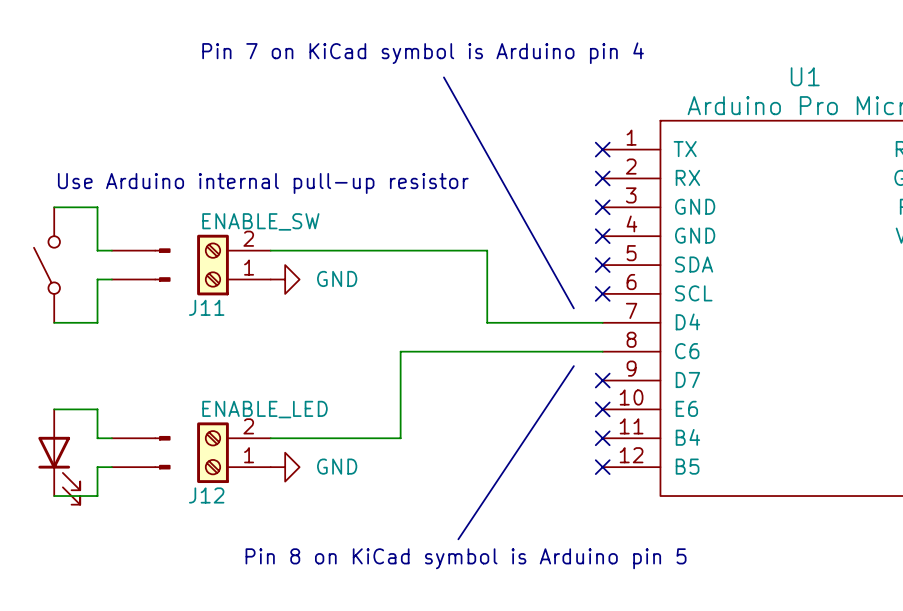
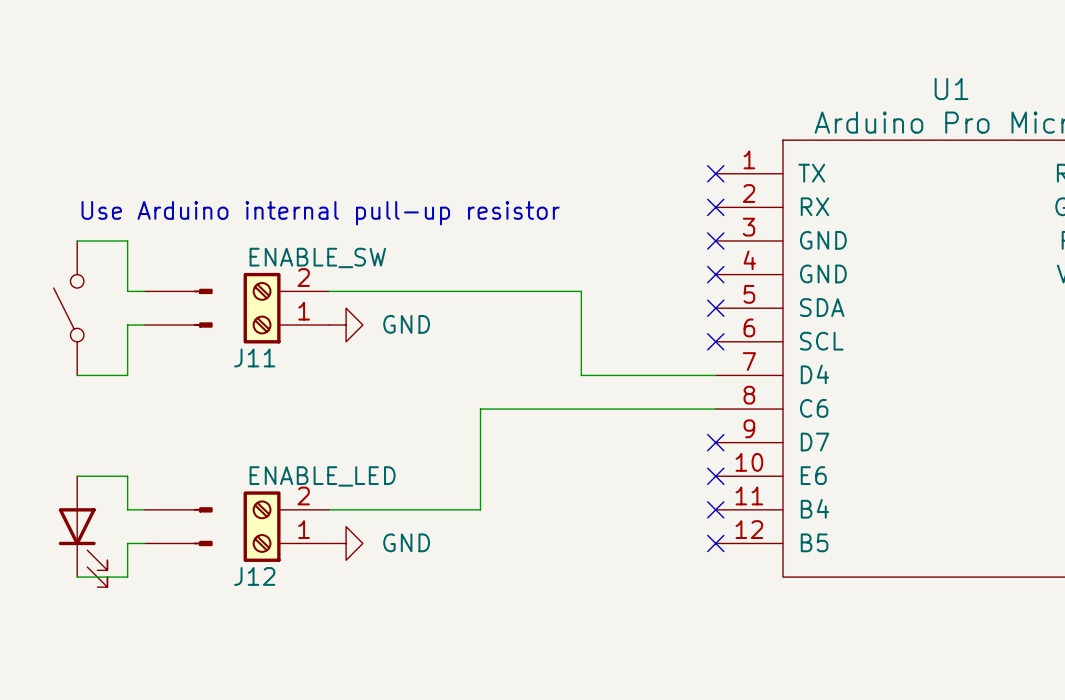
text: Pin 7 on KiCad symbol is Arduino pin 4 (423, 53) -> none
line: (443, 77) (573, 308) -> none
line: (573, 366) (458, 539) -> none
text: Pin 8 on KiCad symbol is Arduino pin 5 (466, 558) -> none

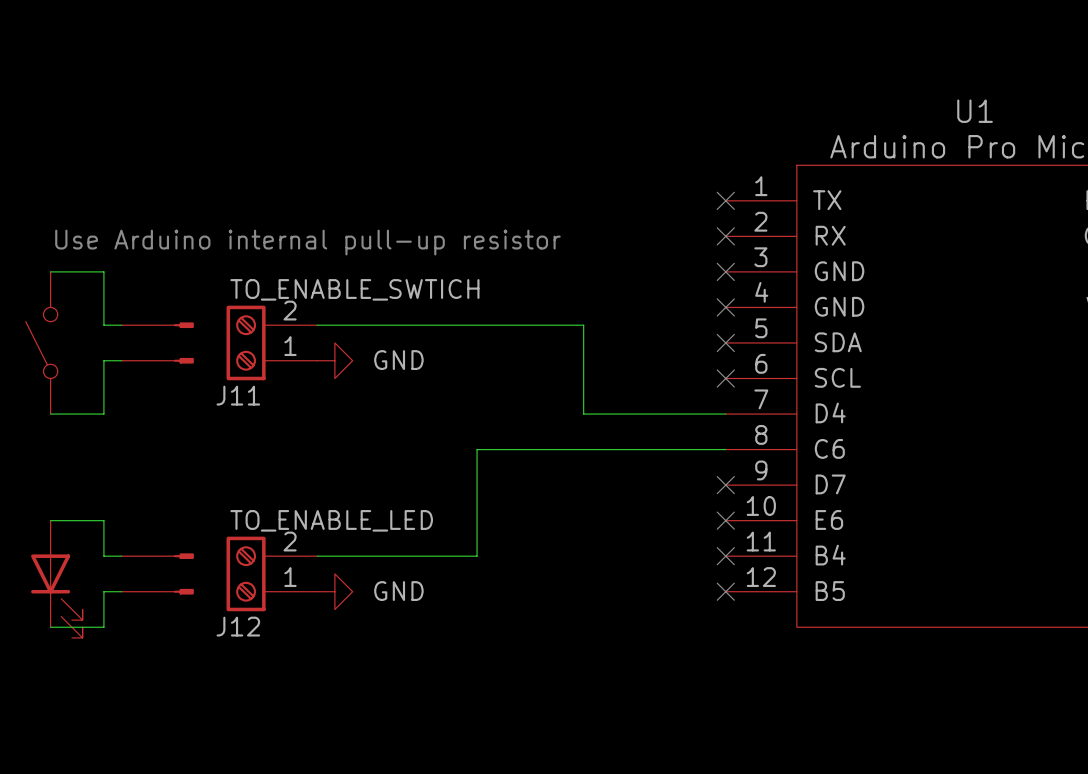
J11 value: ENABLE_SW (317, 257) -> TO_ENABLE_SWTICH (354, 289)
J12 value: ENABLE_LED (322, 476) -> TO_ENABLE_LED (331, 520)

